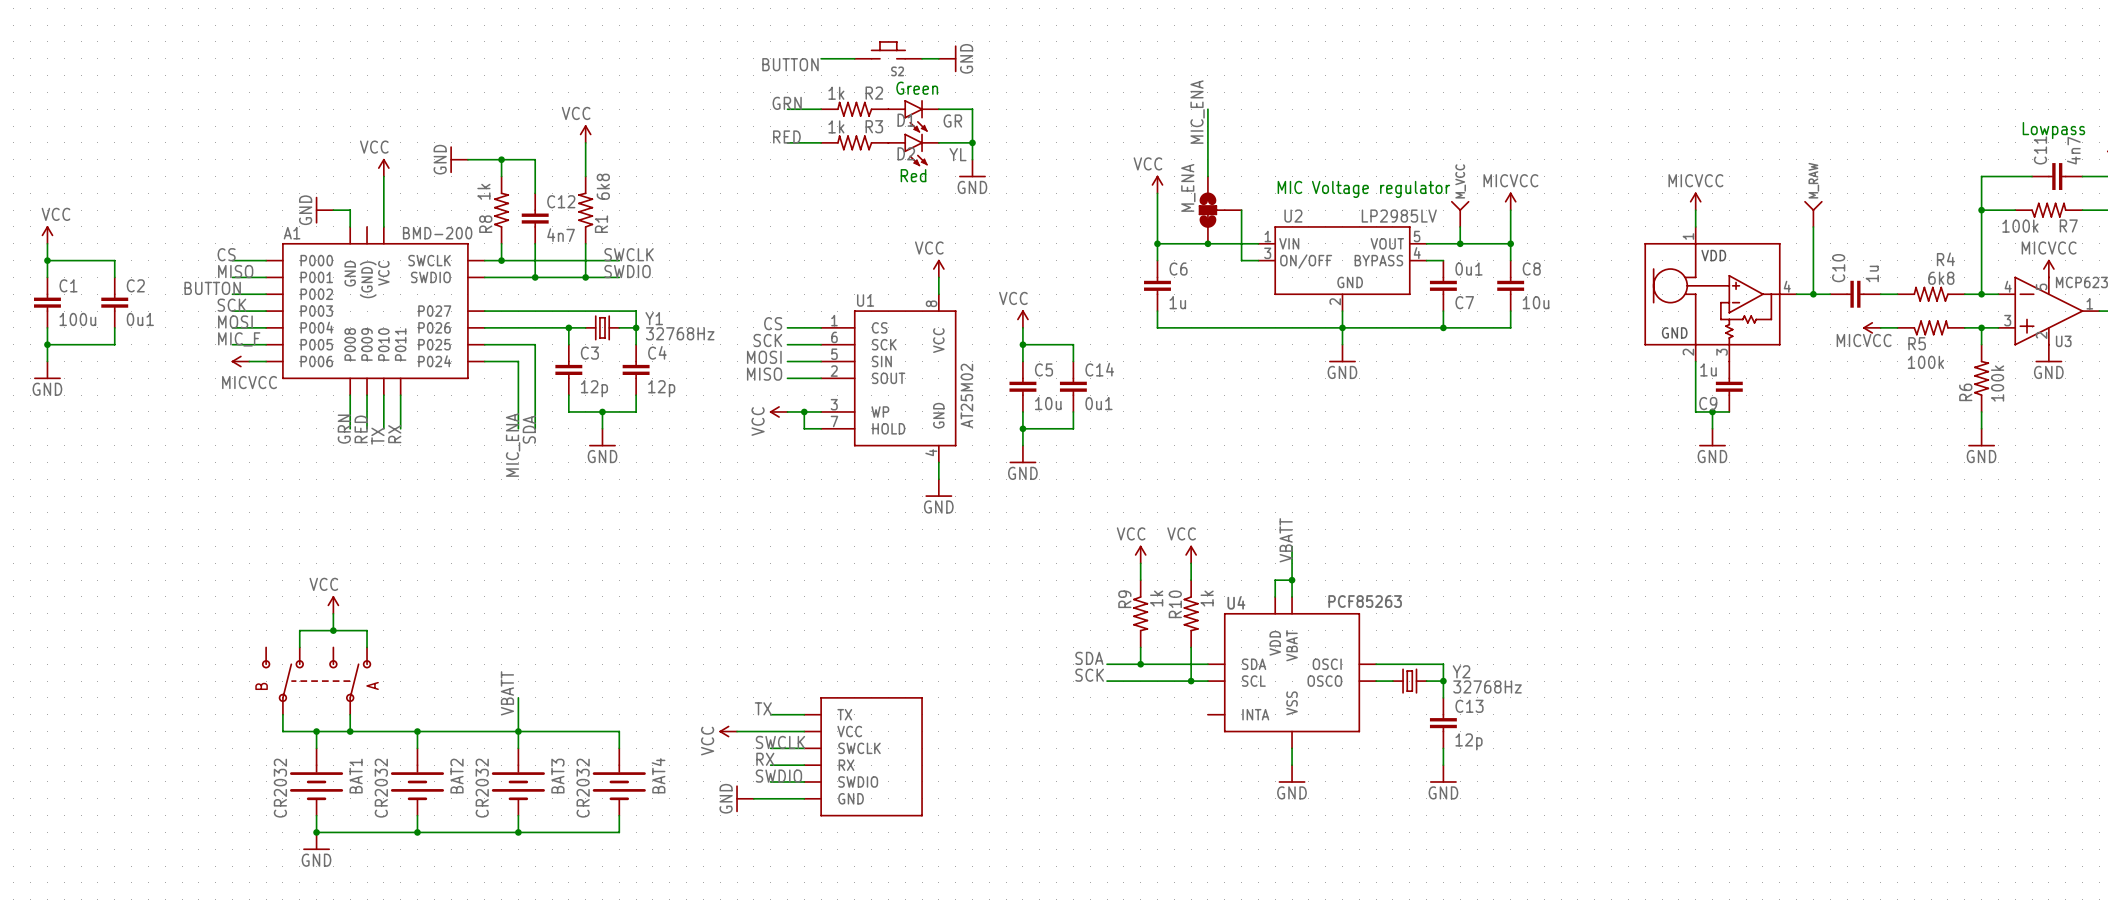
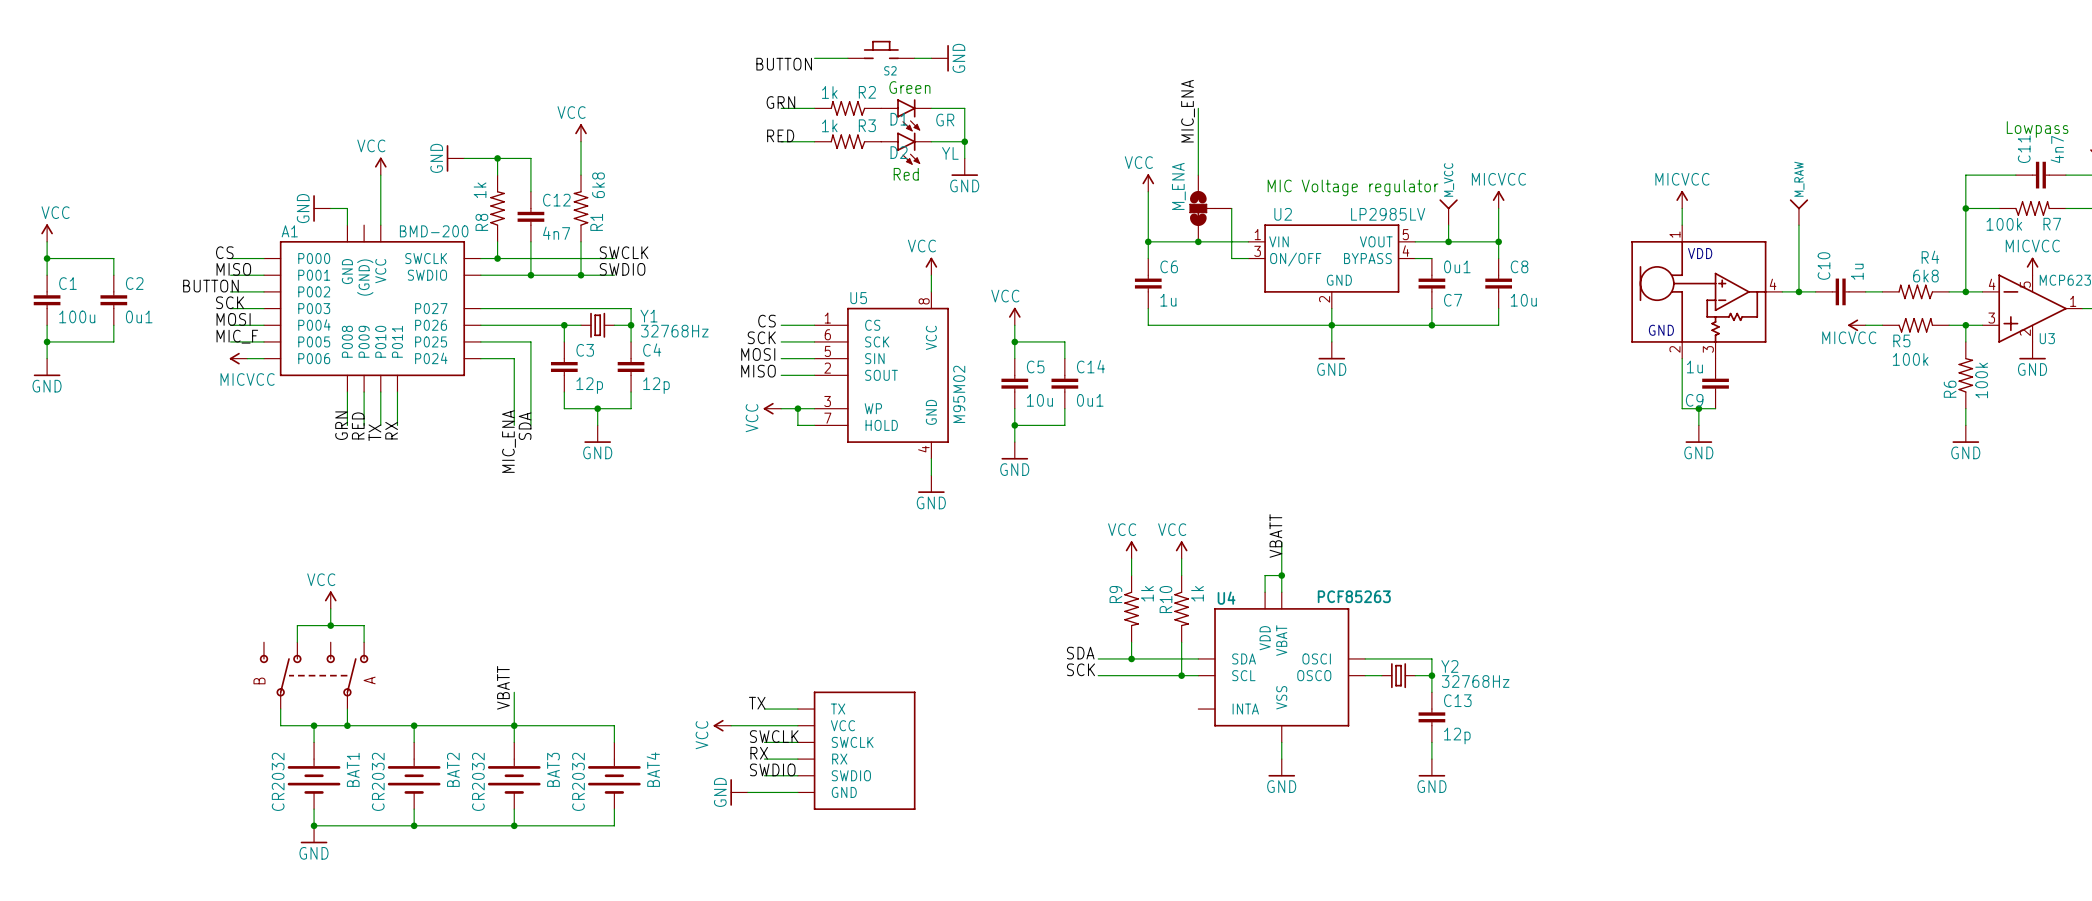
U1 name: U1 (865, 300) -> U5 (858, 298)
U1 value: AT25M02 (966, 395) -> M95M02 (959, 394)

